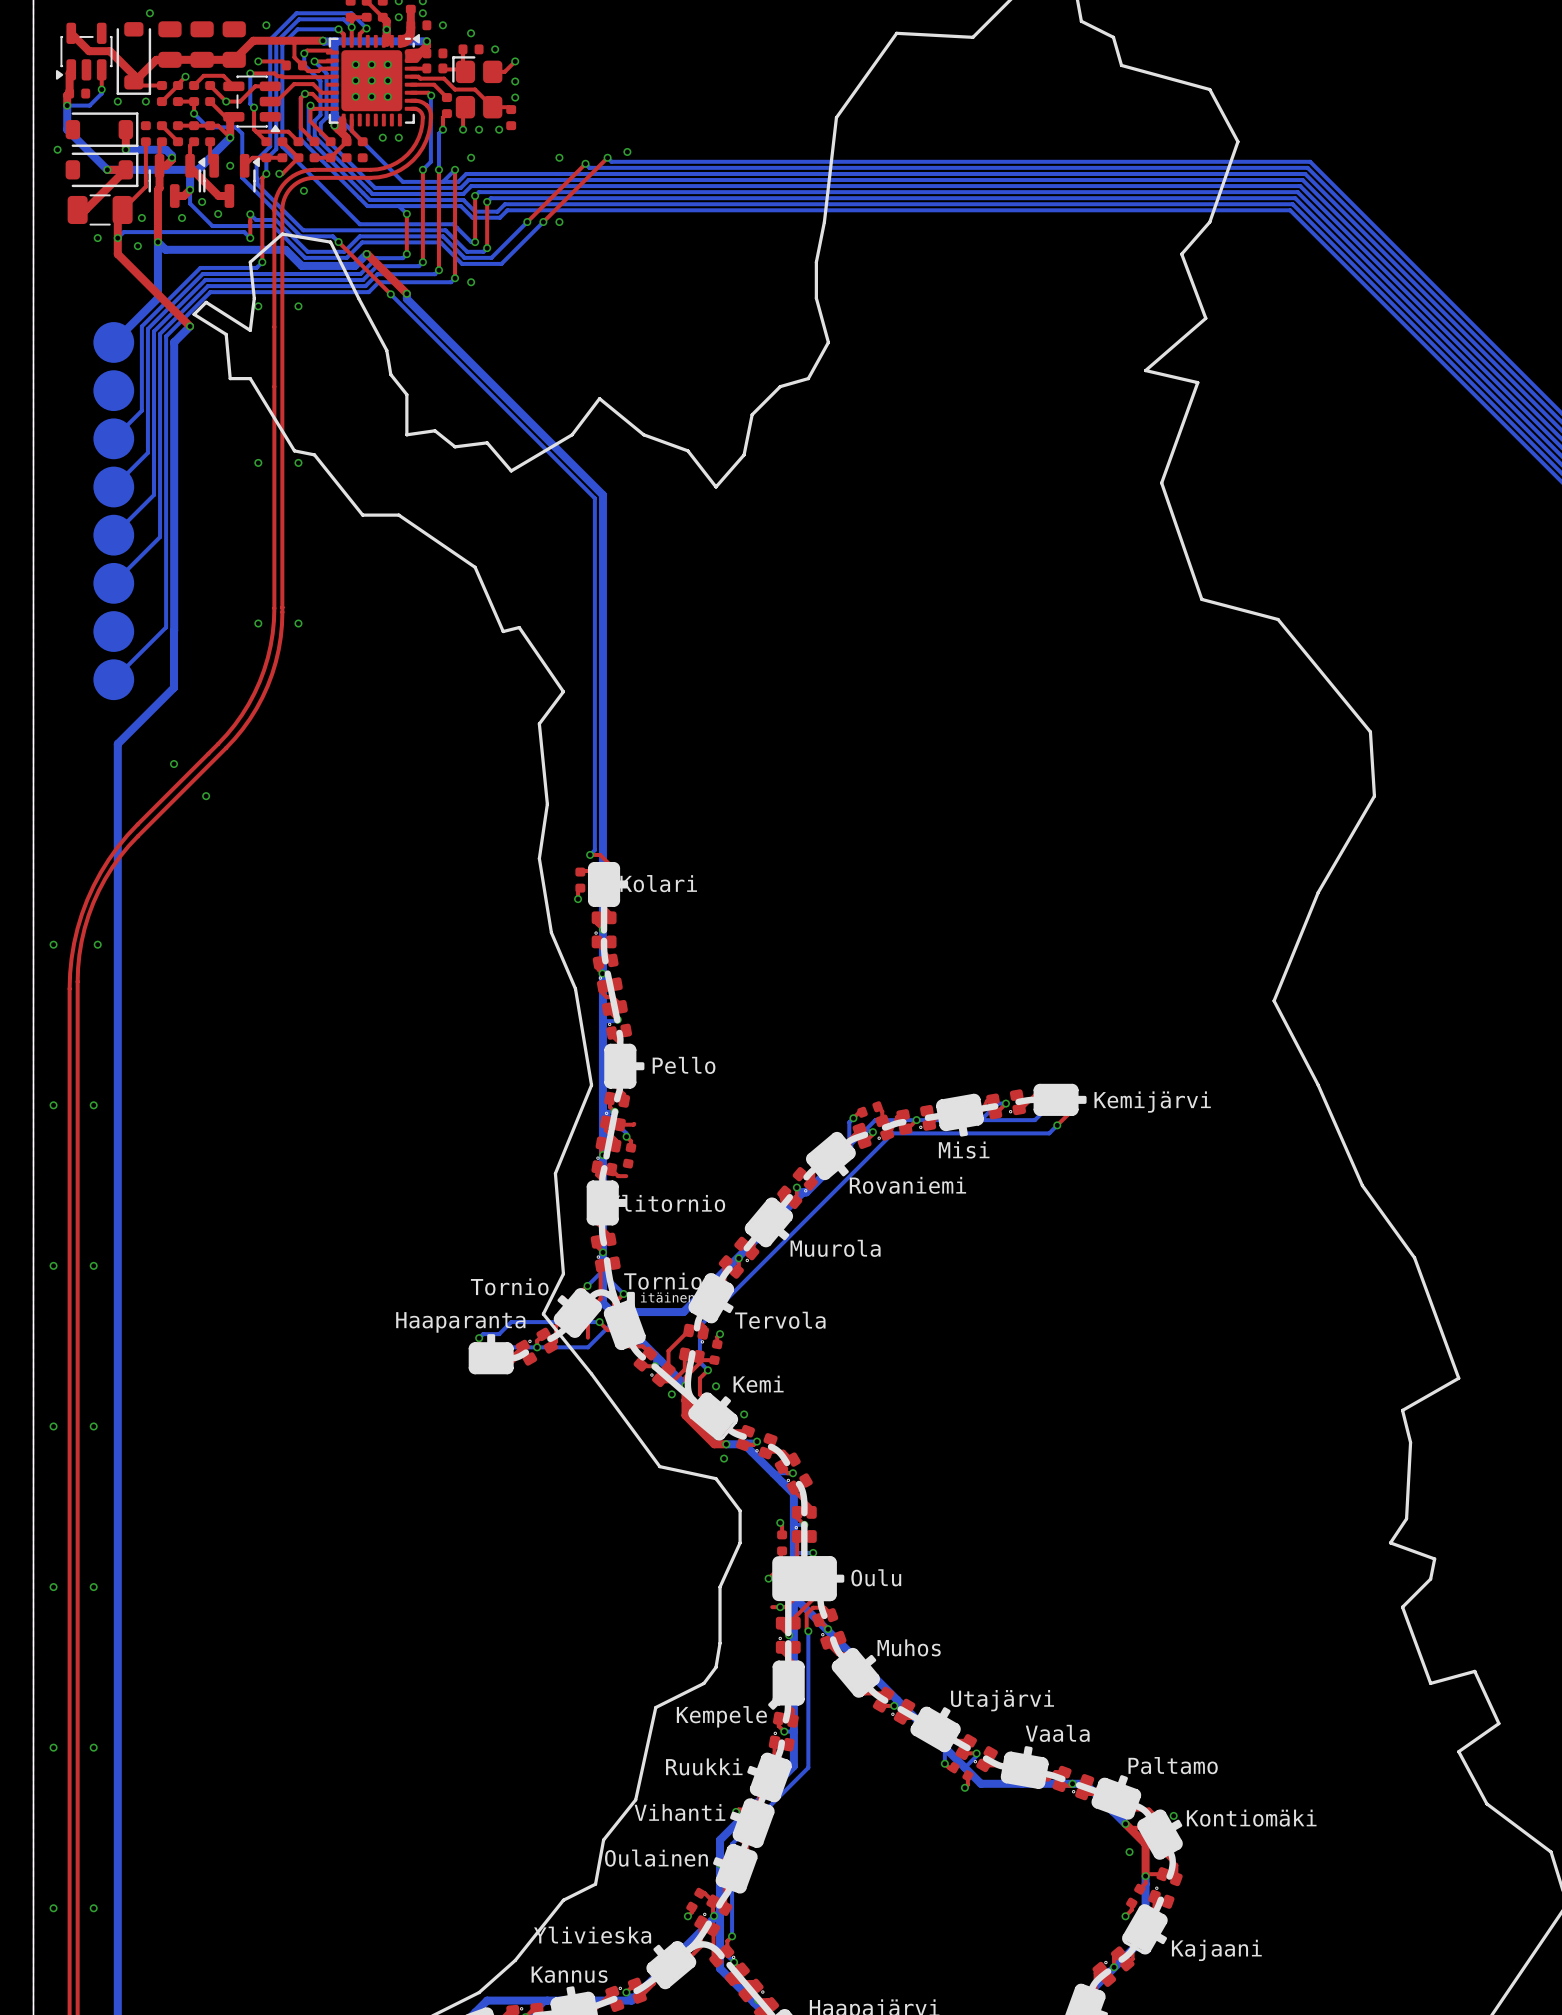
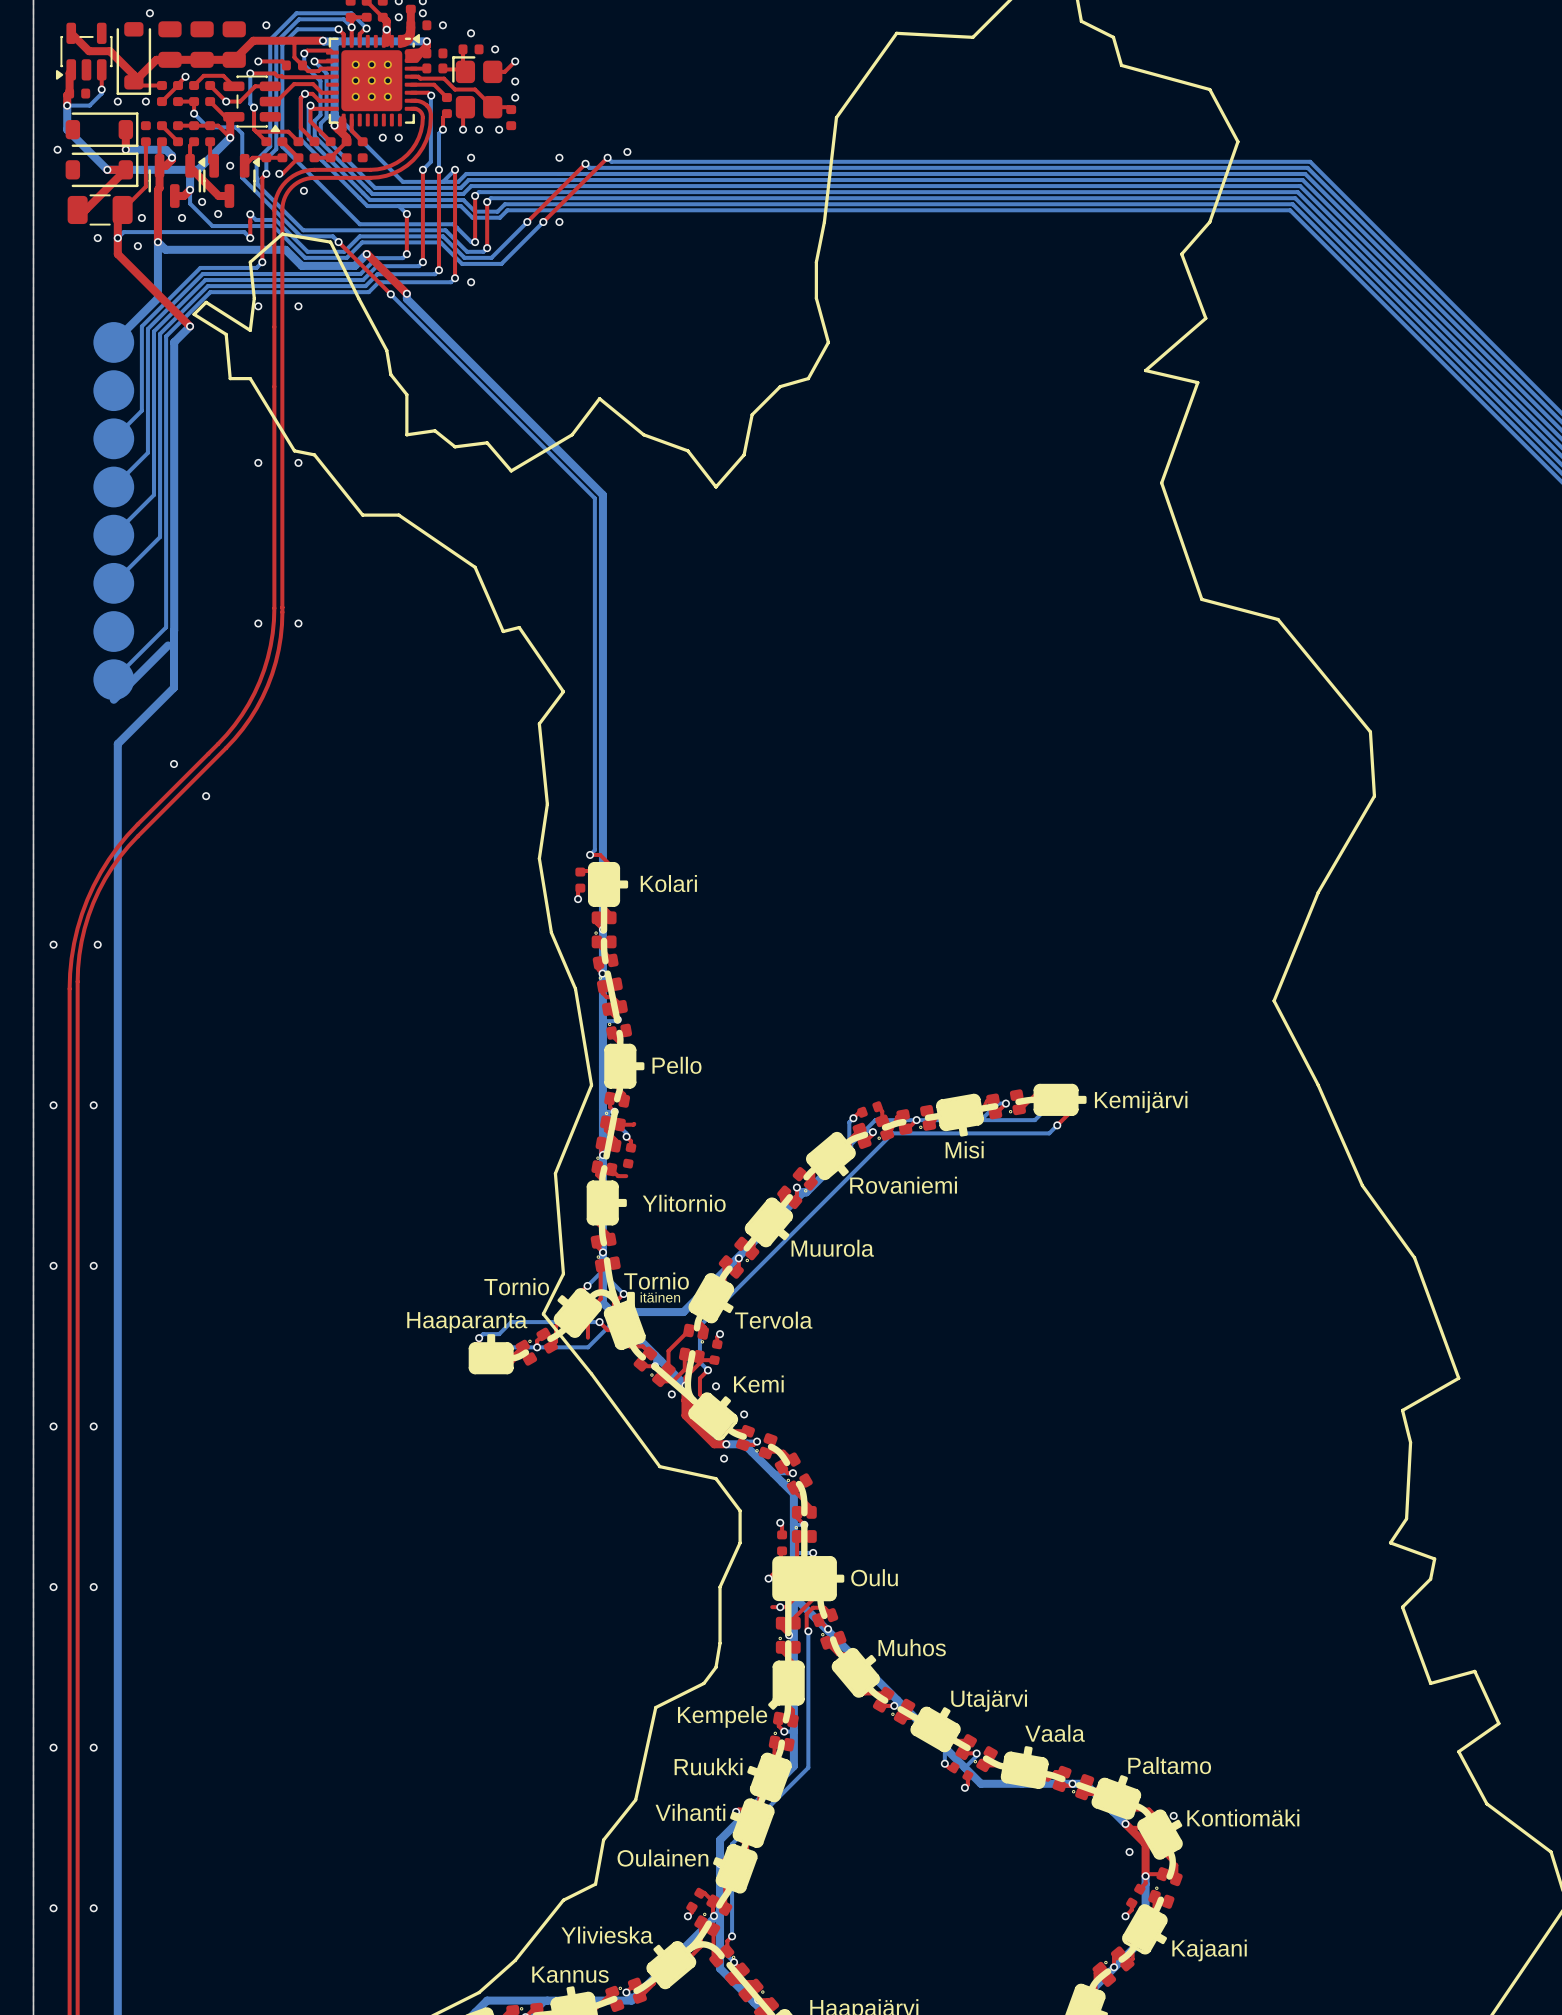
bottom track: none -> (168, 645) (113, 699)

